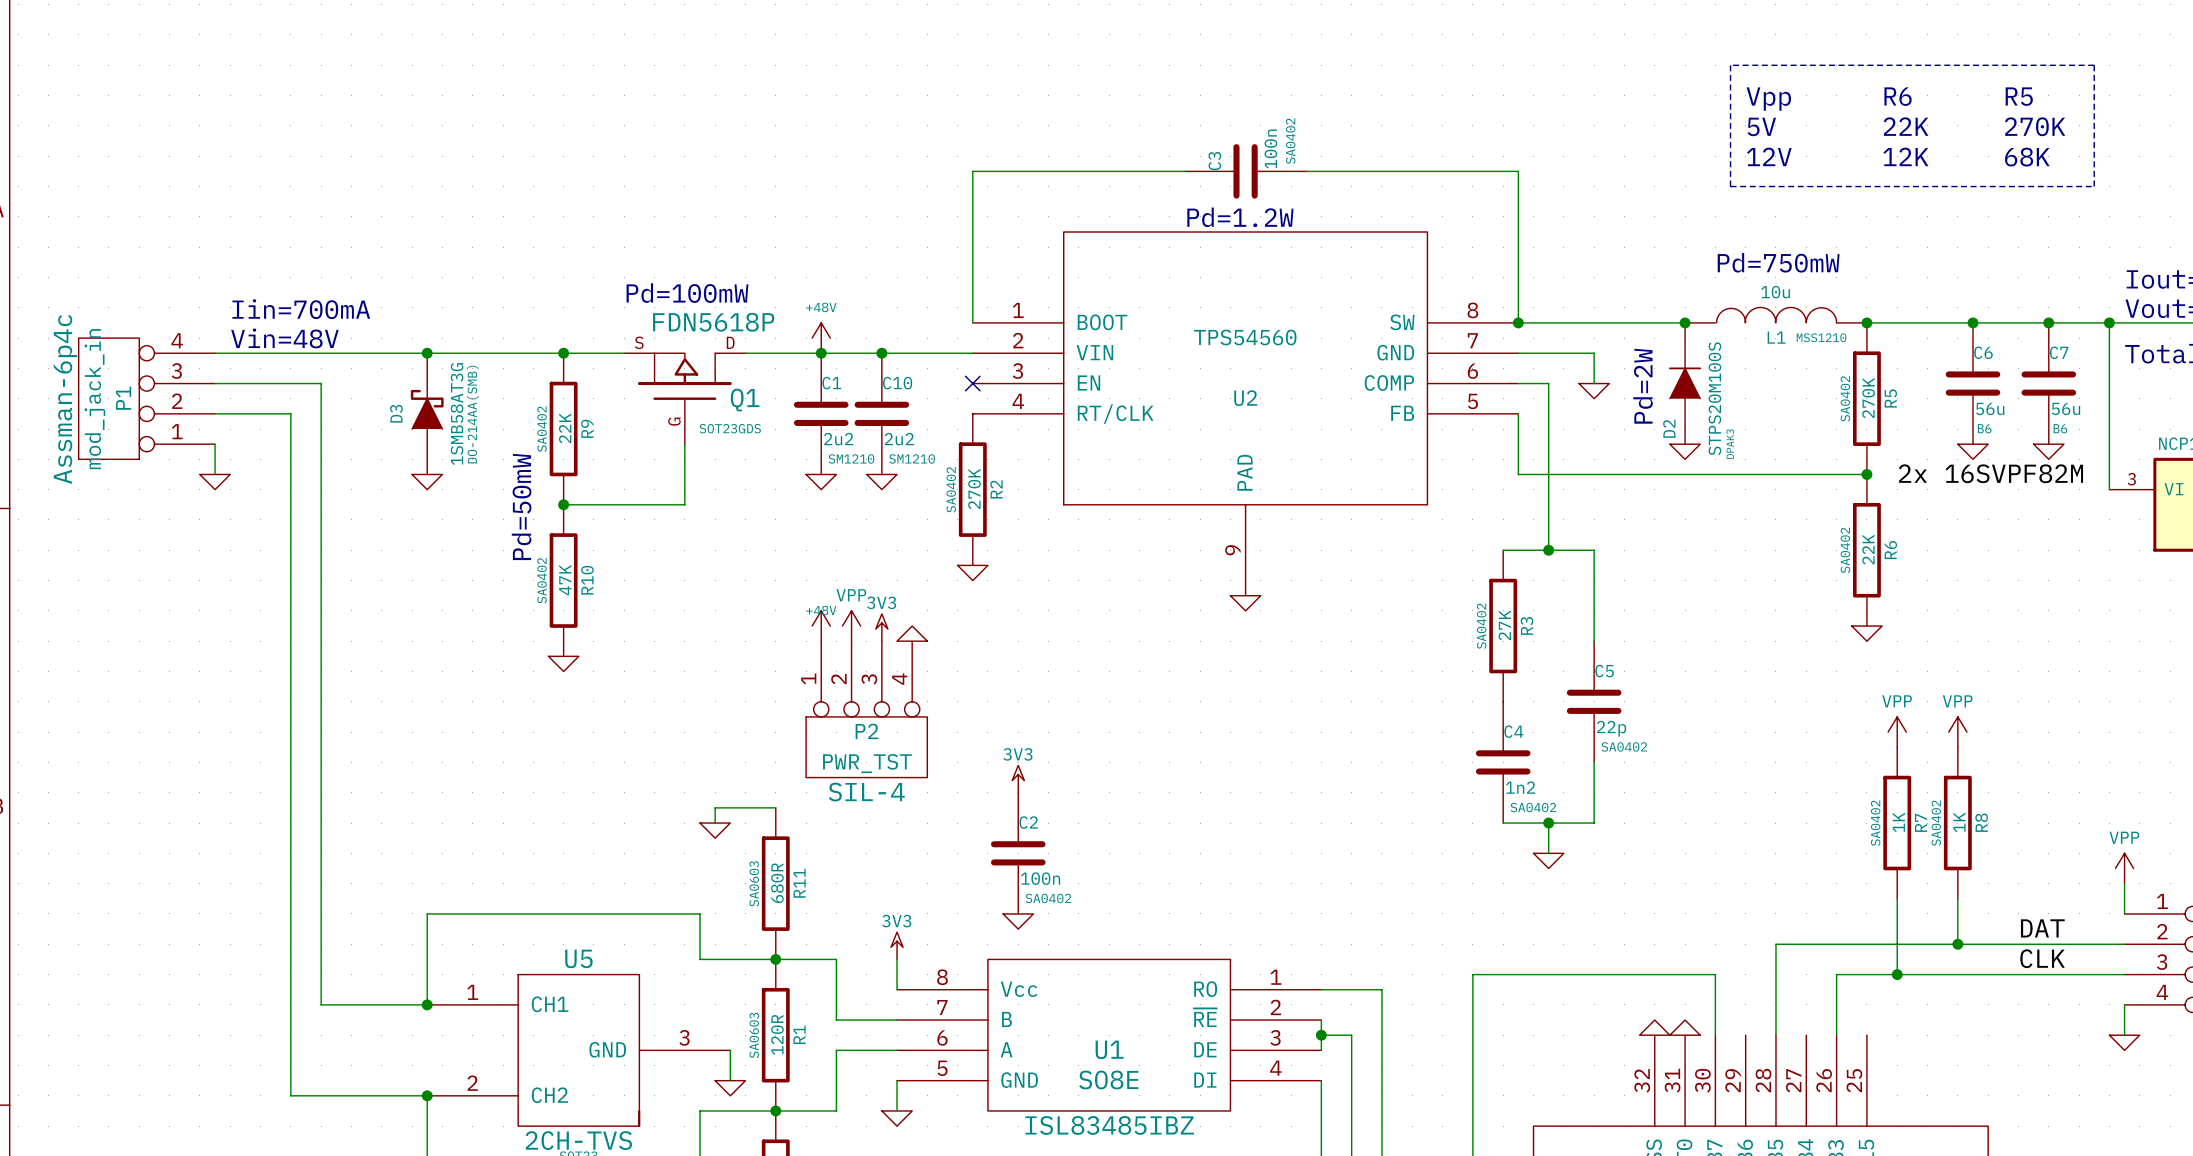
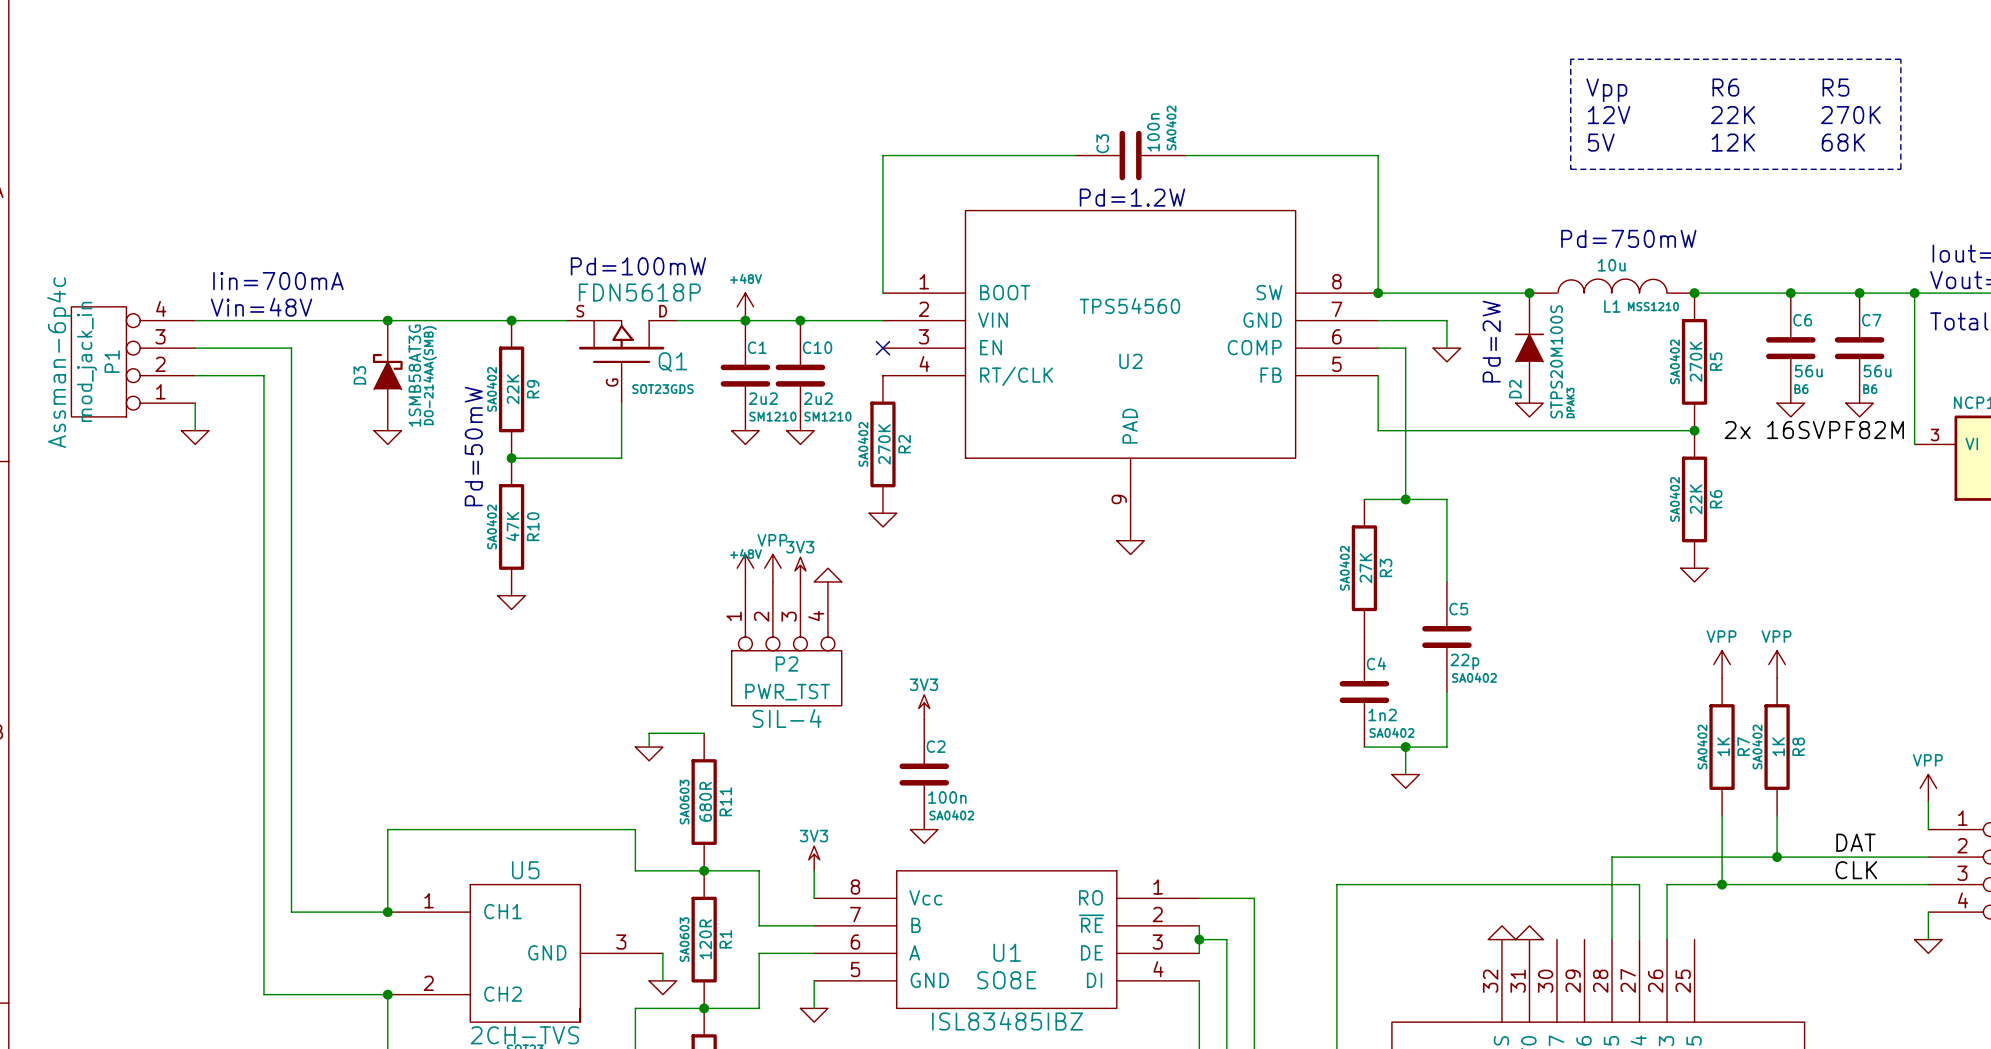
text: 5V (1761, 126) -> 12V (1609, 115)
text: 12V (1769, 156) -> 5V (1601, 142)
wire: (1715, 974) (1715, 1035) -> (1556, 884) (1639, 884) (1639, 939)

